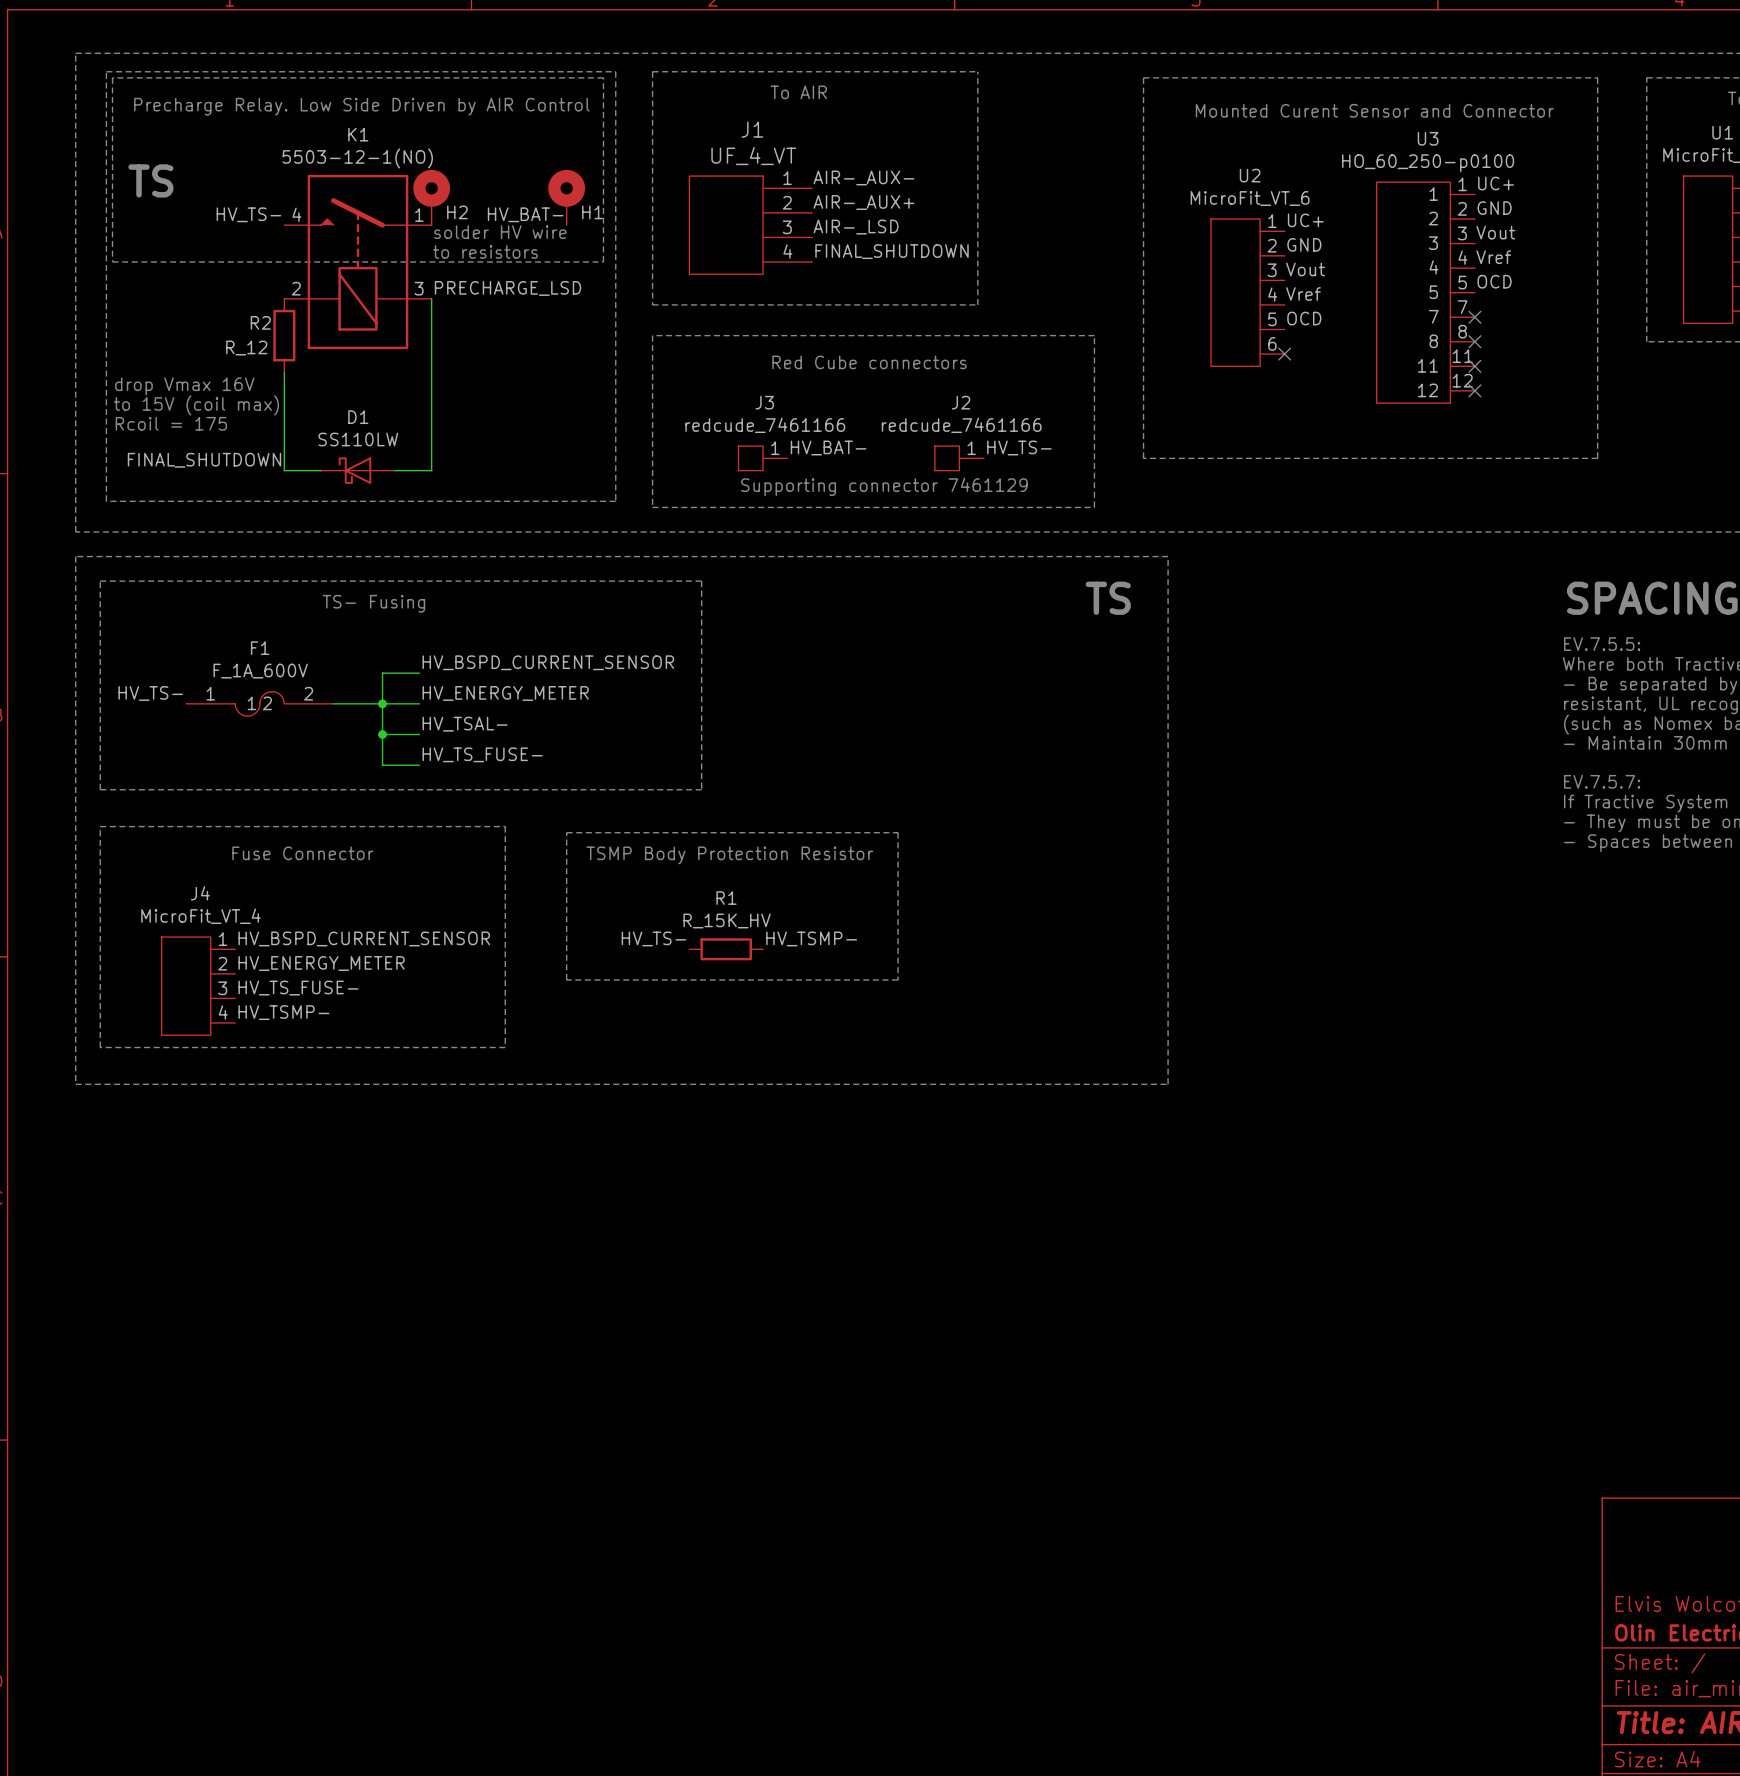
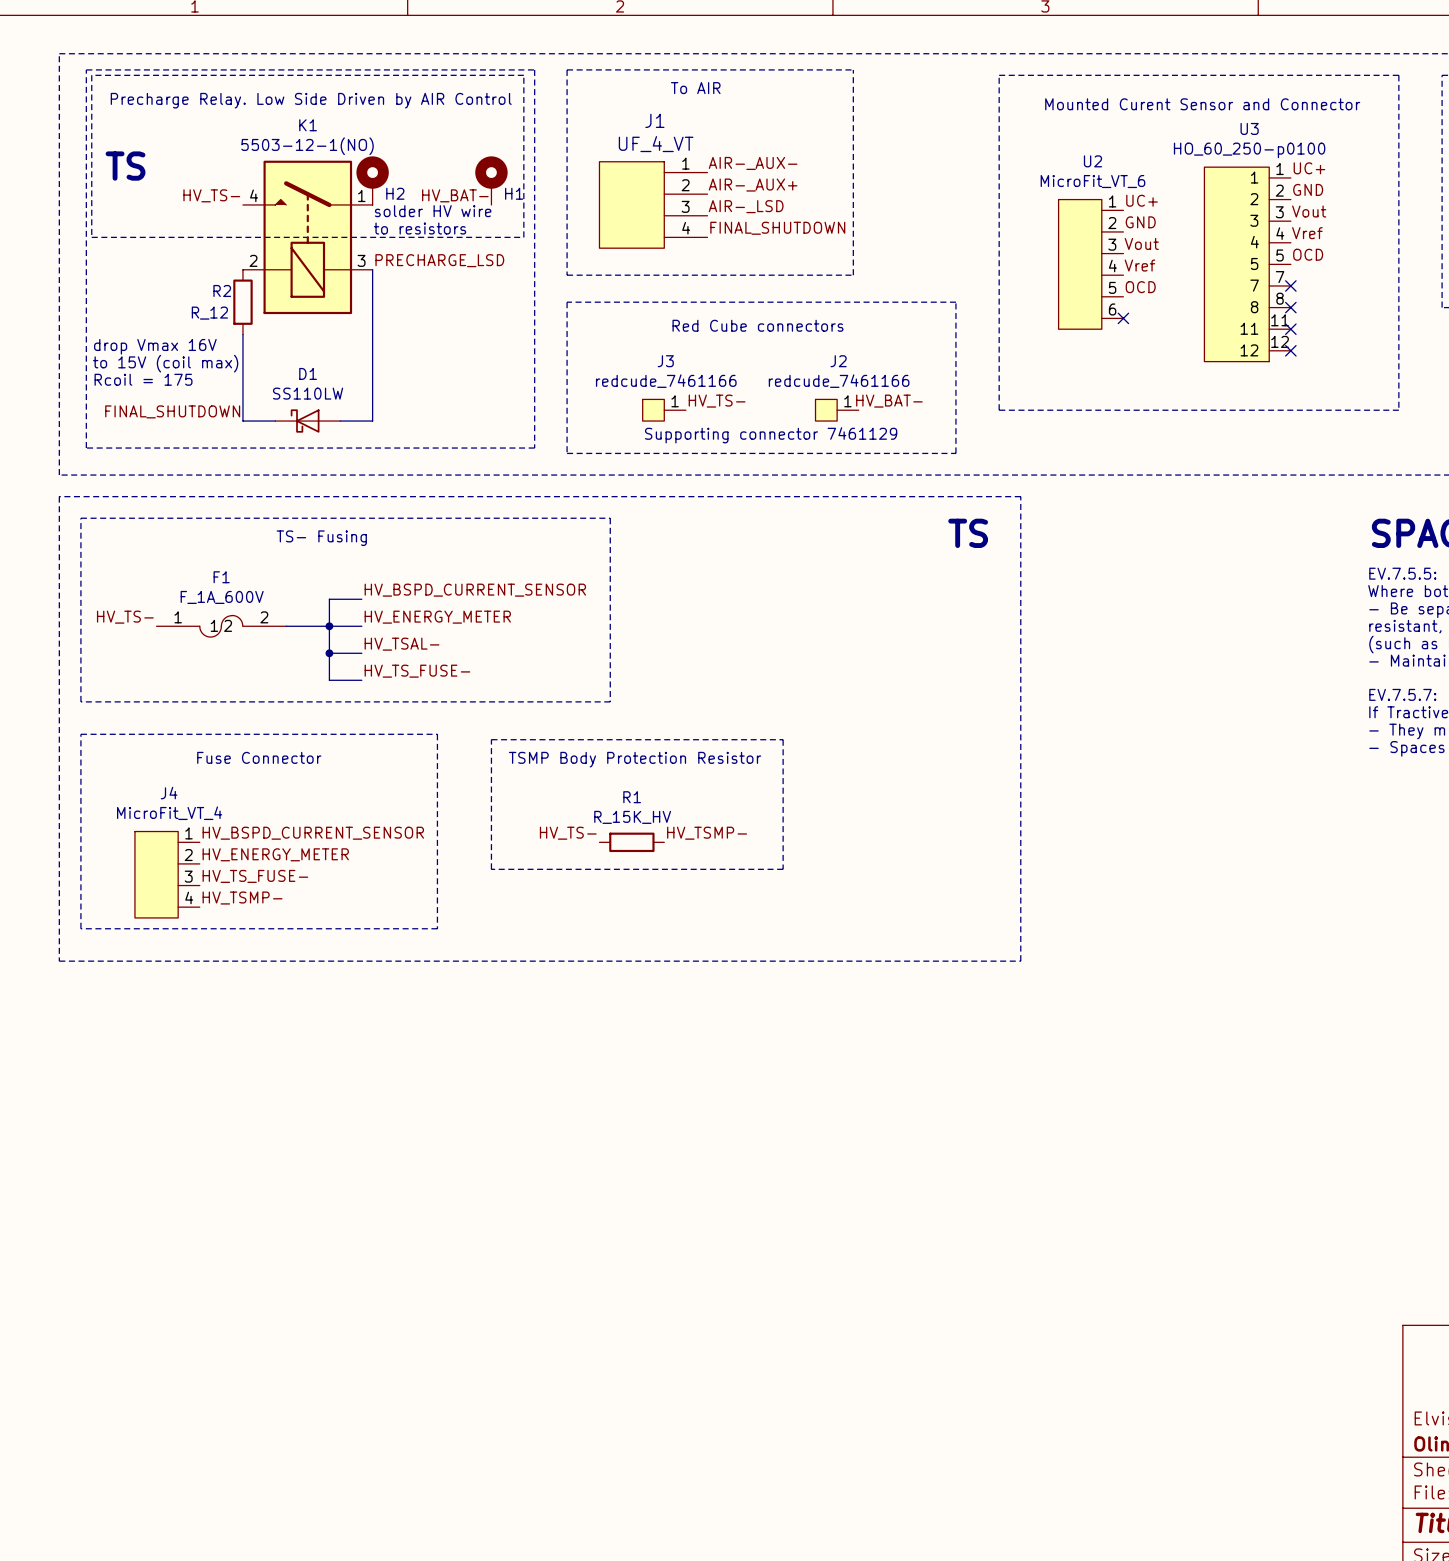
label: HV_BAT- (828, 448) -> HV_TS- (717, 401)
label: HV_TS- (1019, 448) -> HV_BAT- (889, 401)

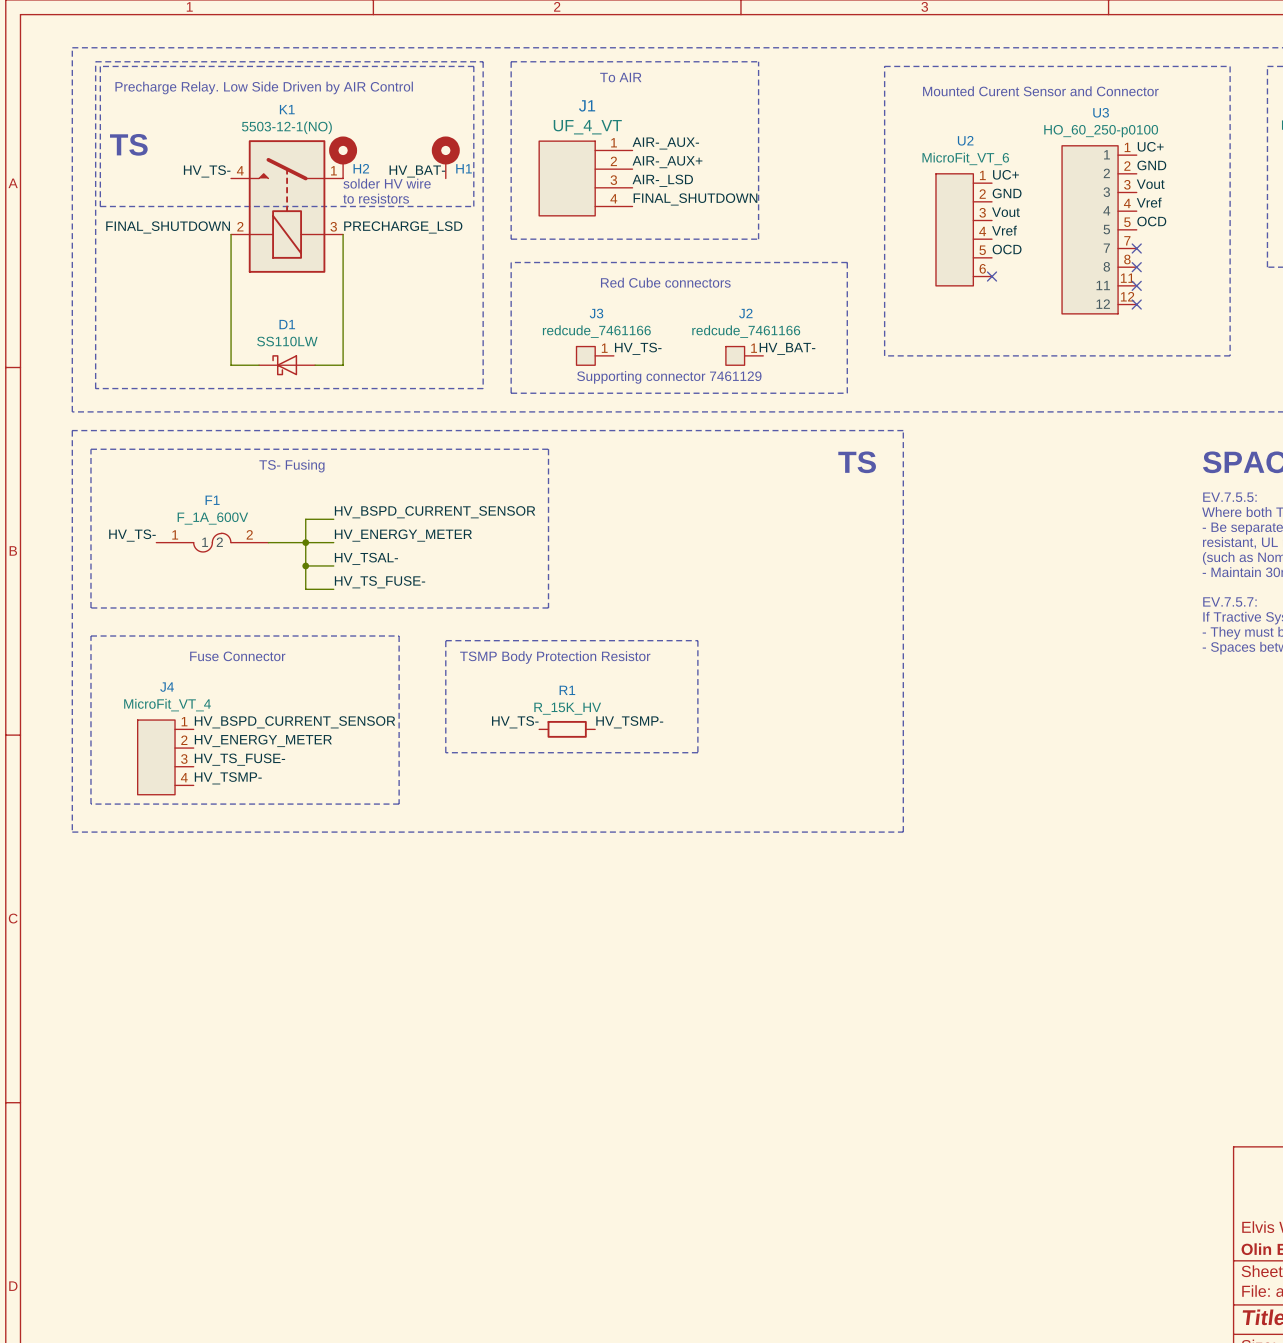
wire: none -> (231, 234) (231, 290)
R2: R_12 (242, 302) -> none
text: drop Vmax 16V (155, 346) -> none
text: to 15V (coil max) (165, 363) -> none
text: Rcoil = 175 (143, 379) -> none
label position: FINAL_SHUTDOWN (172, 411) -> FINAL_SHUTDOWN (168, 227)

